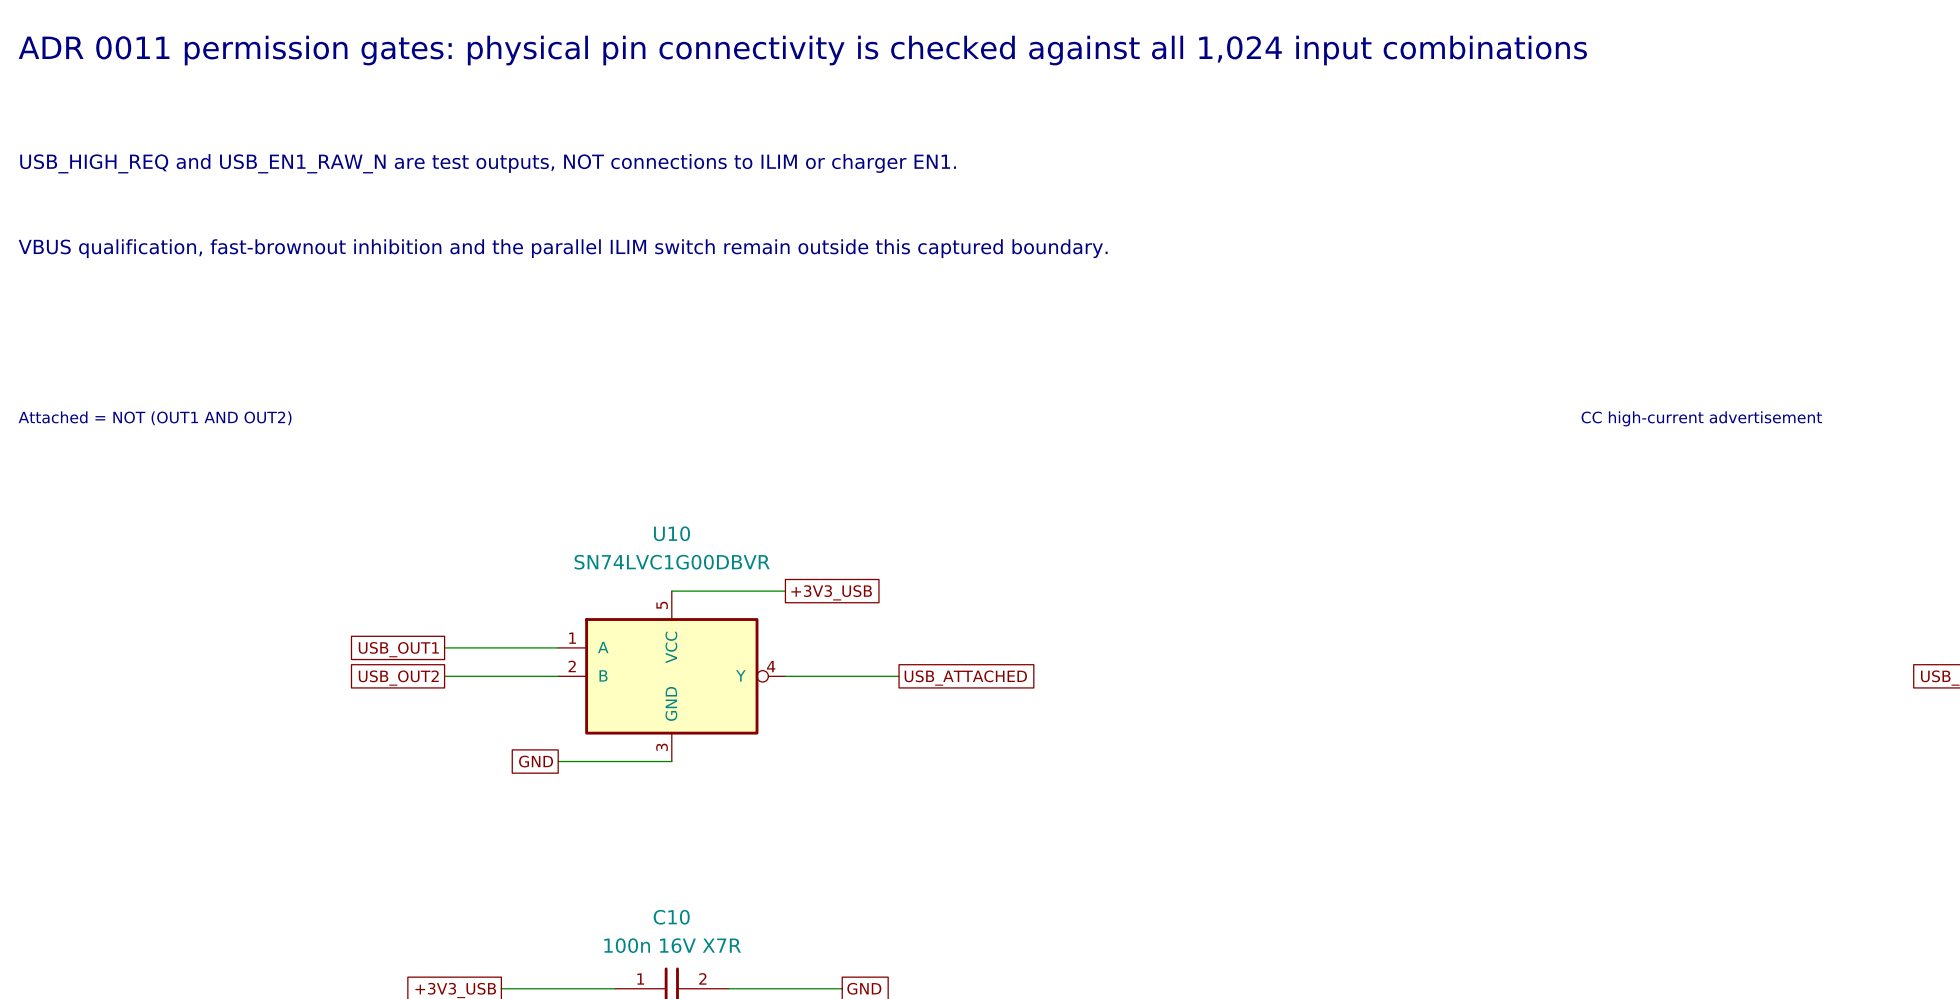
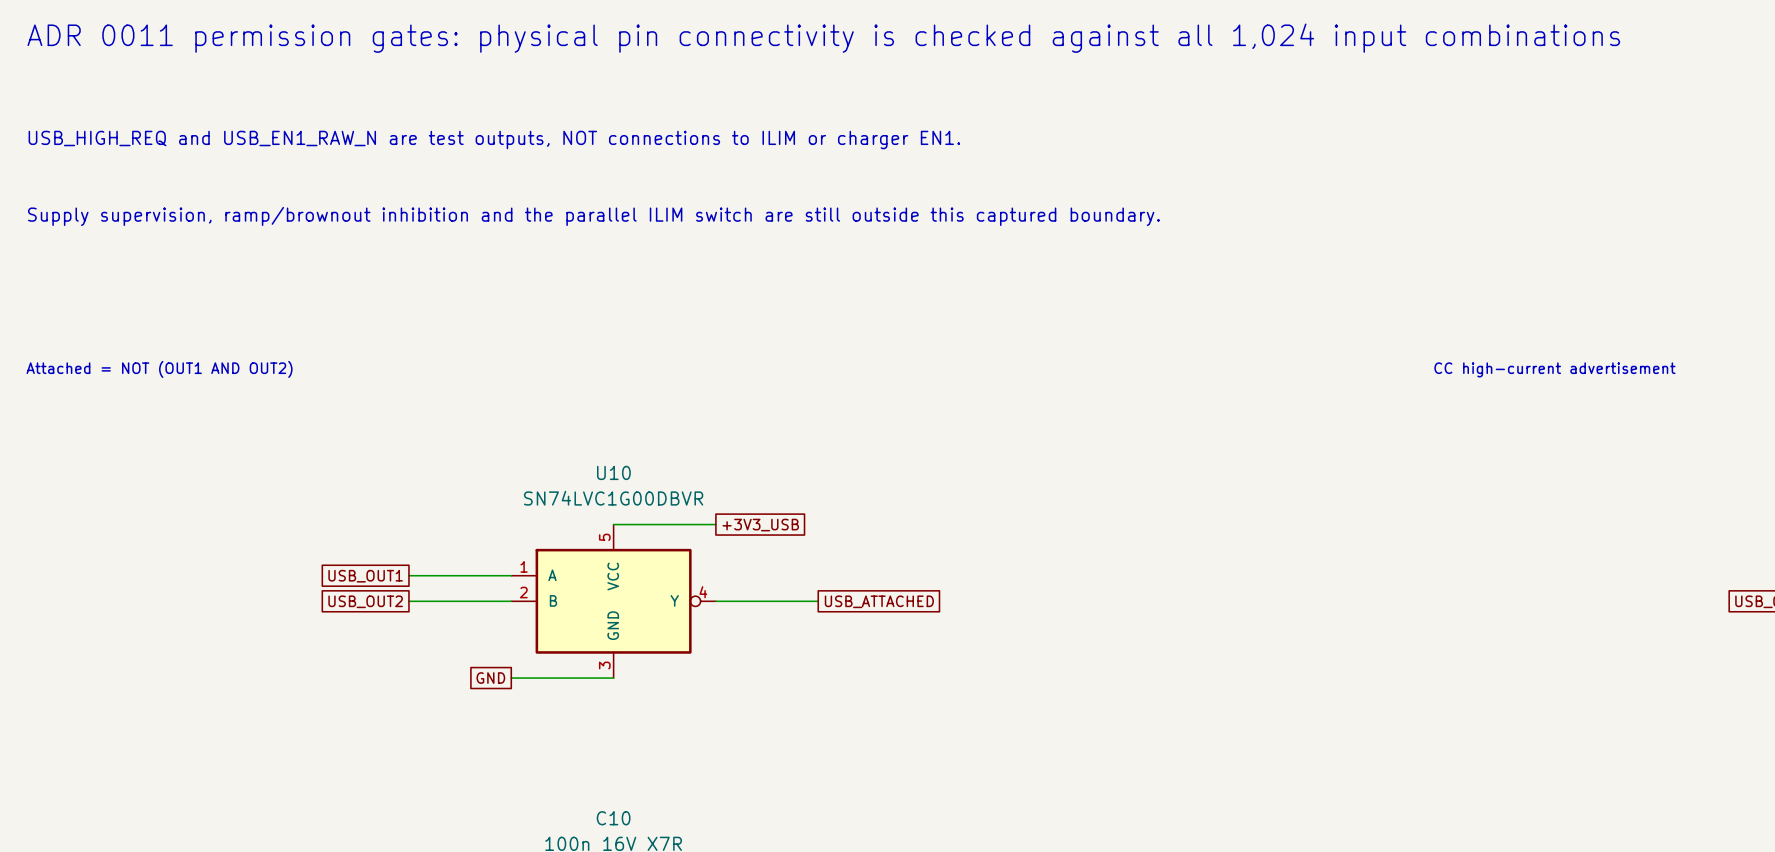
text: VBUS qualification, fast-brownout inhibition and the parallel ILIM switch remain outside this captured boundary. (563, 248) -> Supply supervision, ramp/brownout inhibition and the parallel ILIM switch are still outside this captured boundary. (593, 216)

